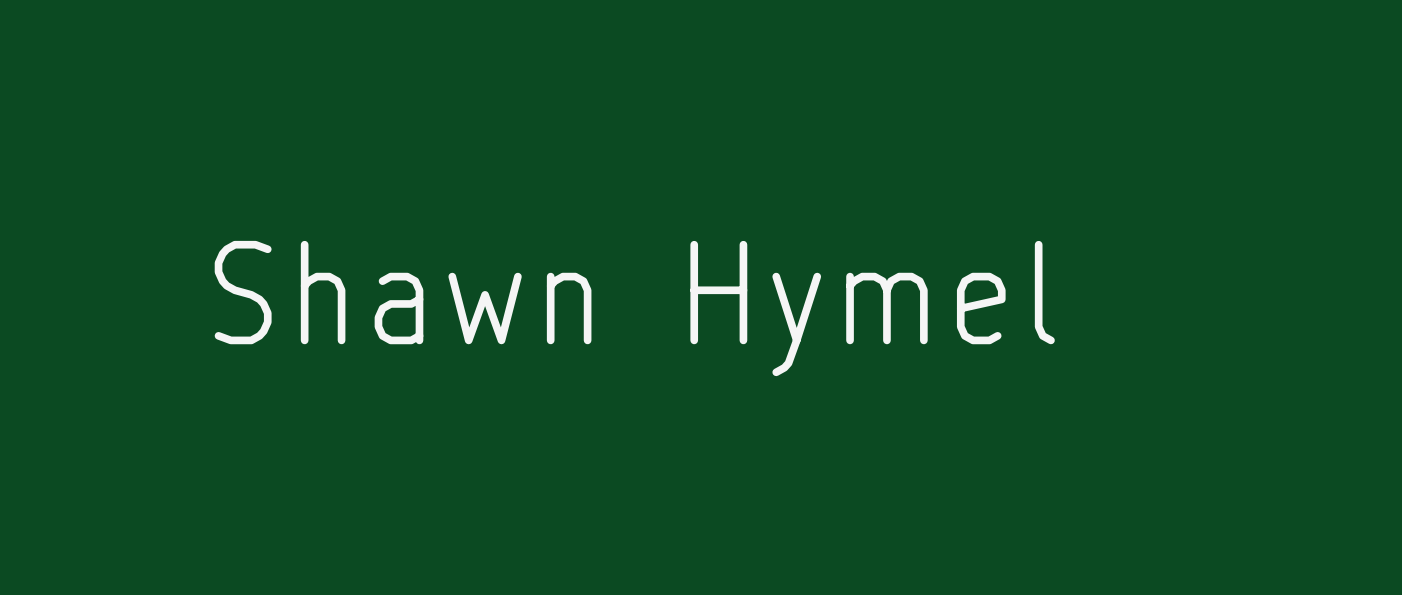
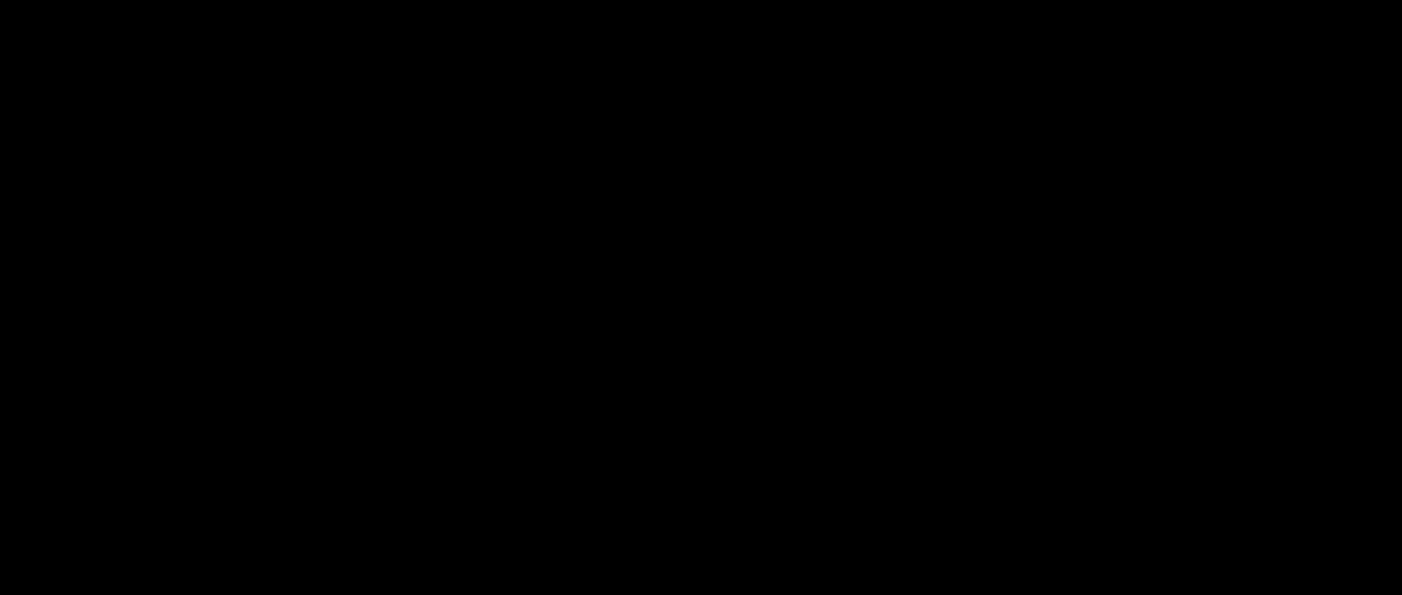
text: Shawn Hymel (634, 308) -> none

